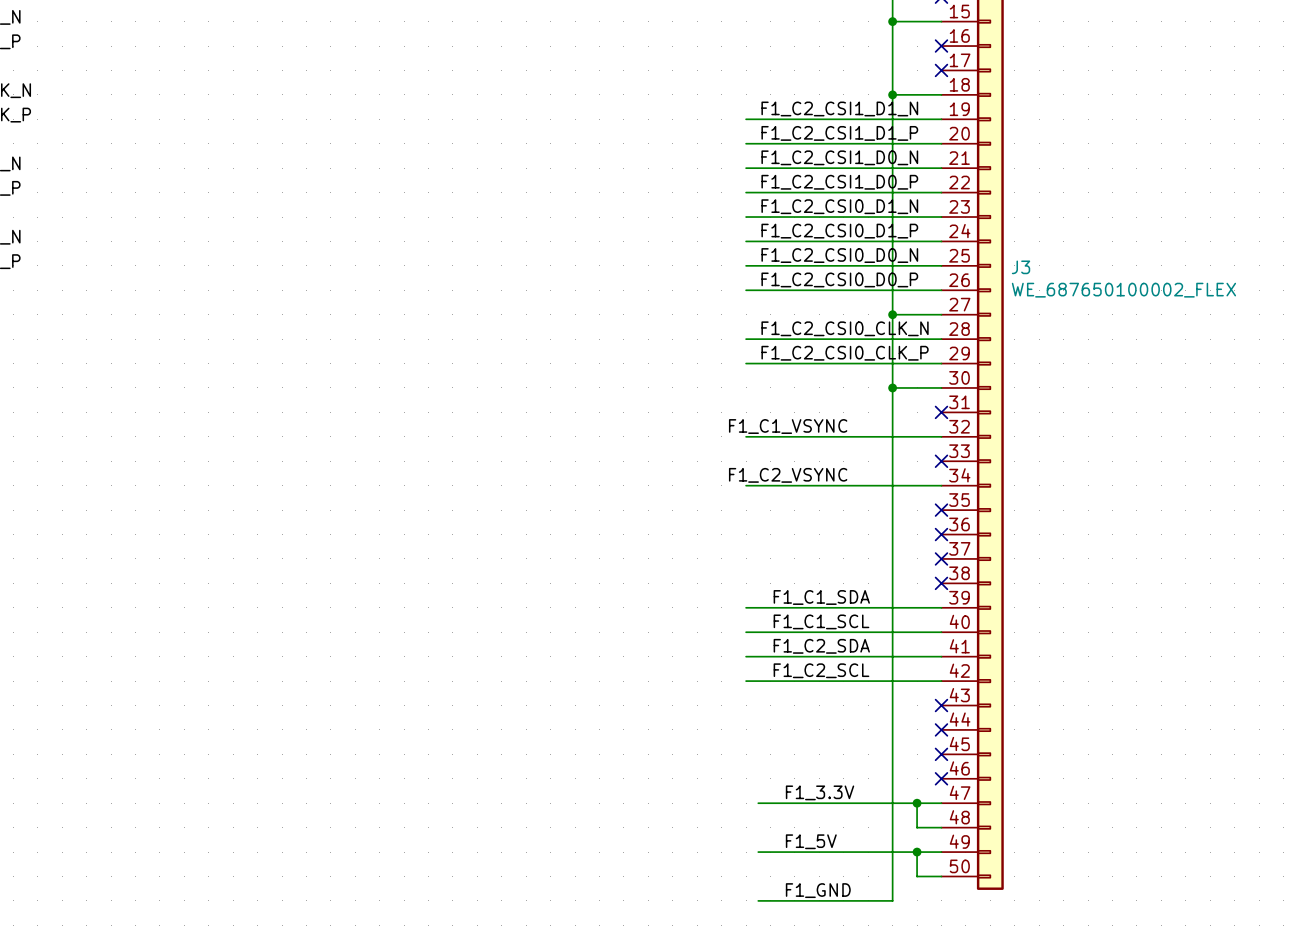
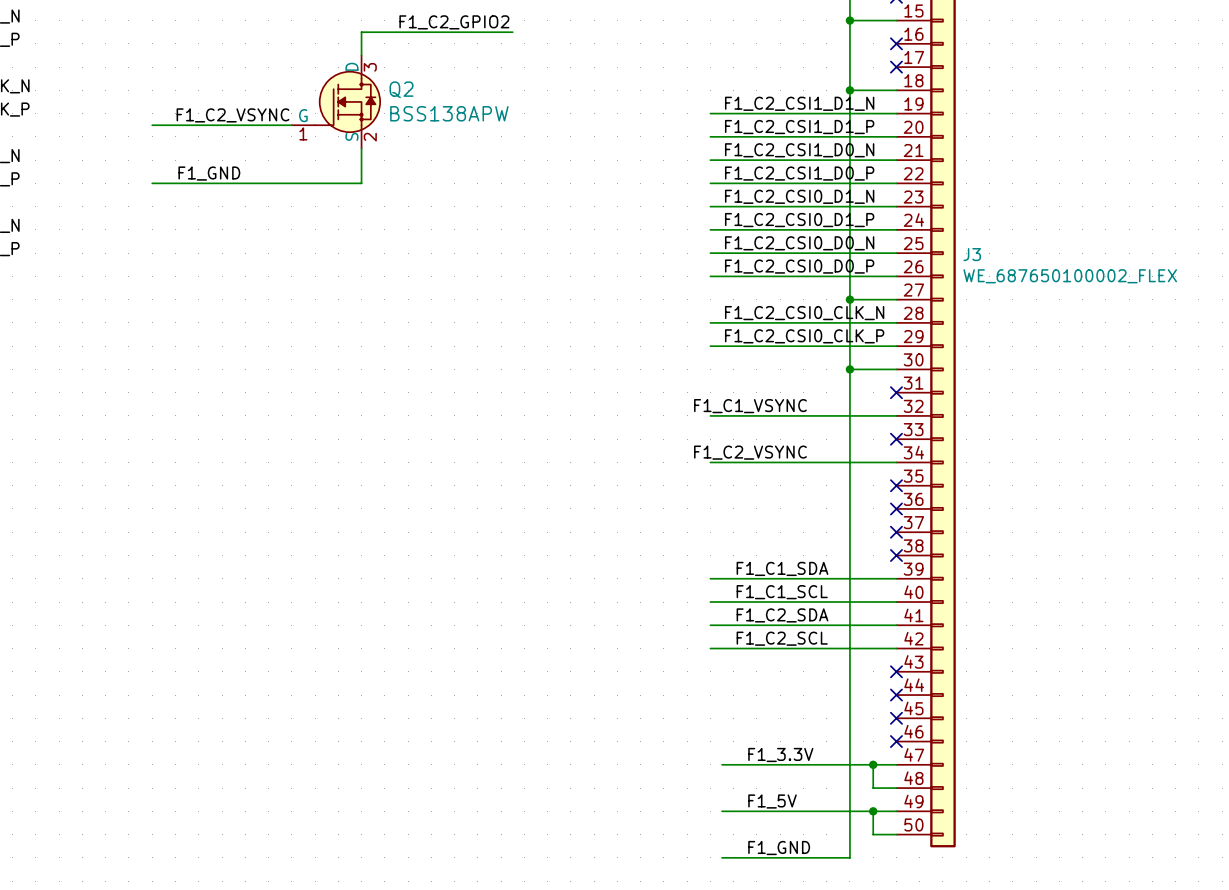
label: none -> F1_C2_GPIO2 (454, 22)
wire: none -> (512, 32) (361, 32) (361, 55)
Q2: none -> BSS138APW (335, 101)
label: none -> F1_C2_VSYNC (232, 115)
wire: none -> (152, 125) (291, 125)
wire: none -> (361, 148) (361, 183) (152, 183)
label: none -> F1_GND (209, 173)

